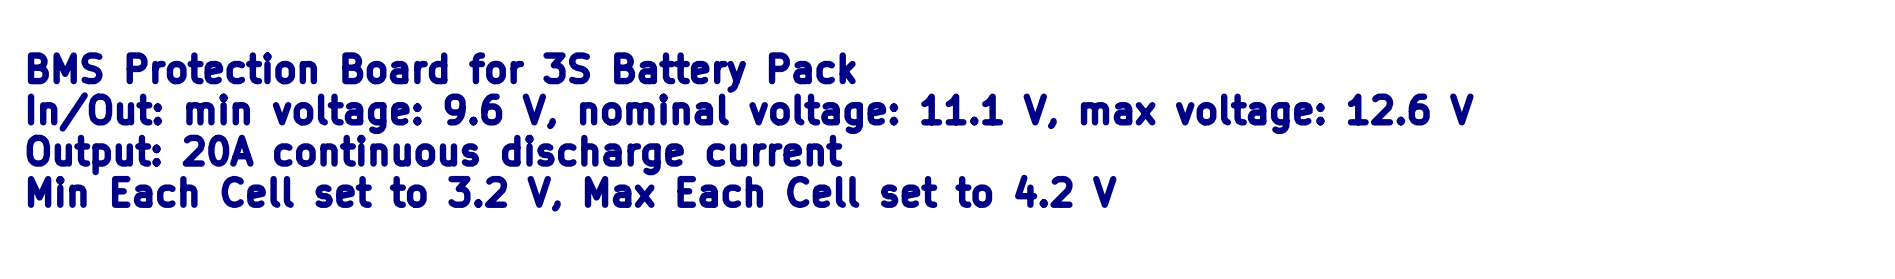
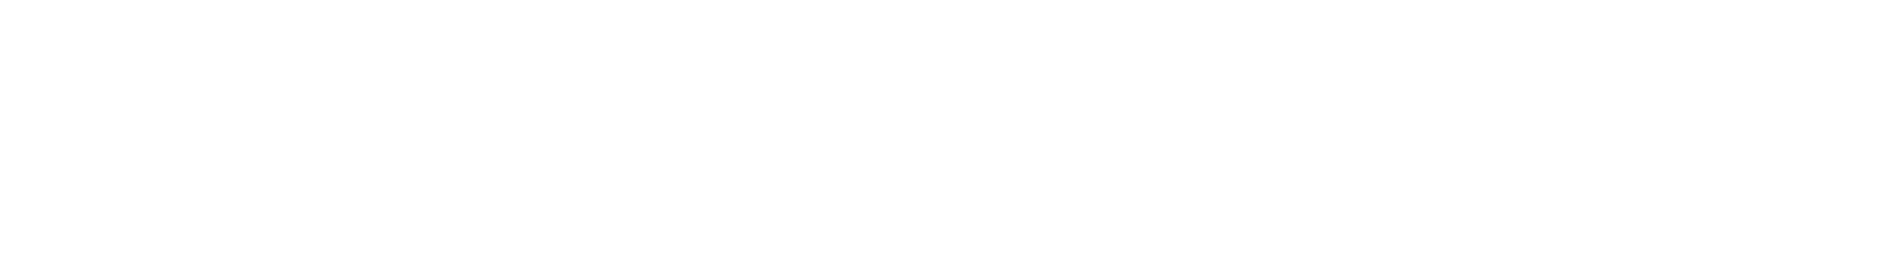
text: BMS Protection Board for 3S Battery Pack (441, 72) -> none
text: In/Out: min voltage: 9.6 V, nominal voltage: 11.1 V, max voltage: 12.6 V (750, 113) -> none
text: Output: 20A continuous discharge current (434, 154) -> none
text: Min Each Cell set to 3.2 V, Max Each Cell set to 4.2 V (572, 193) -> none

